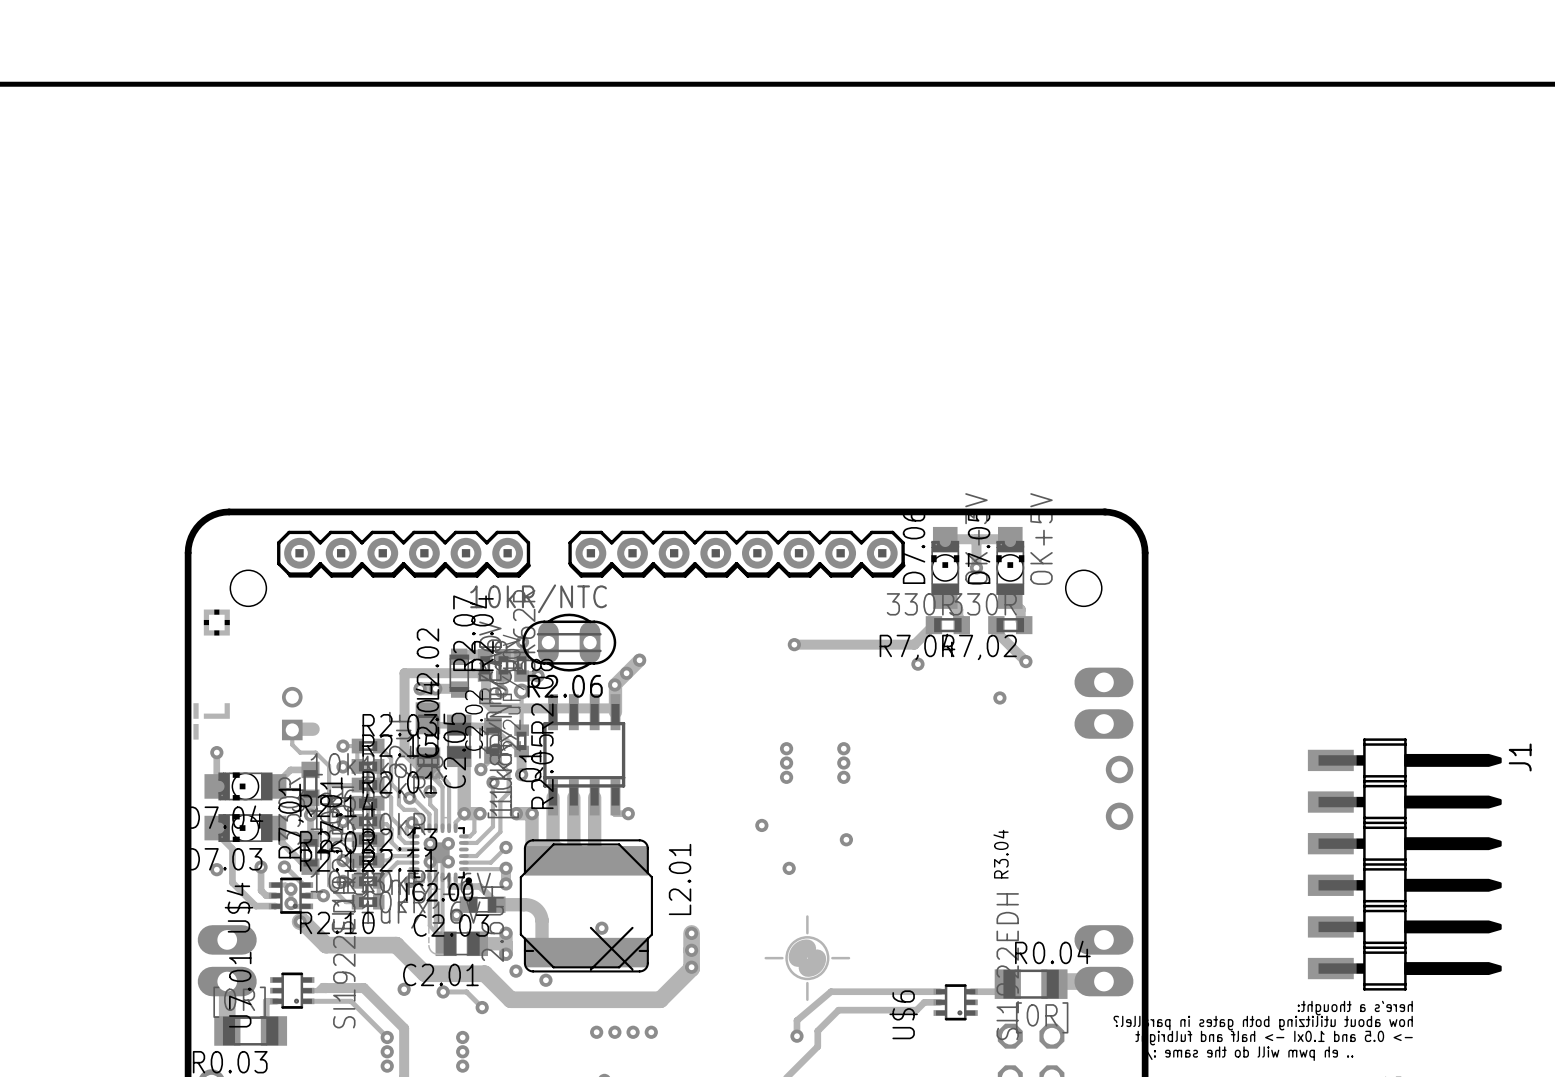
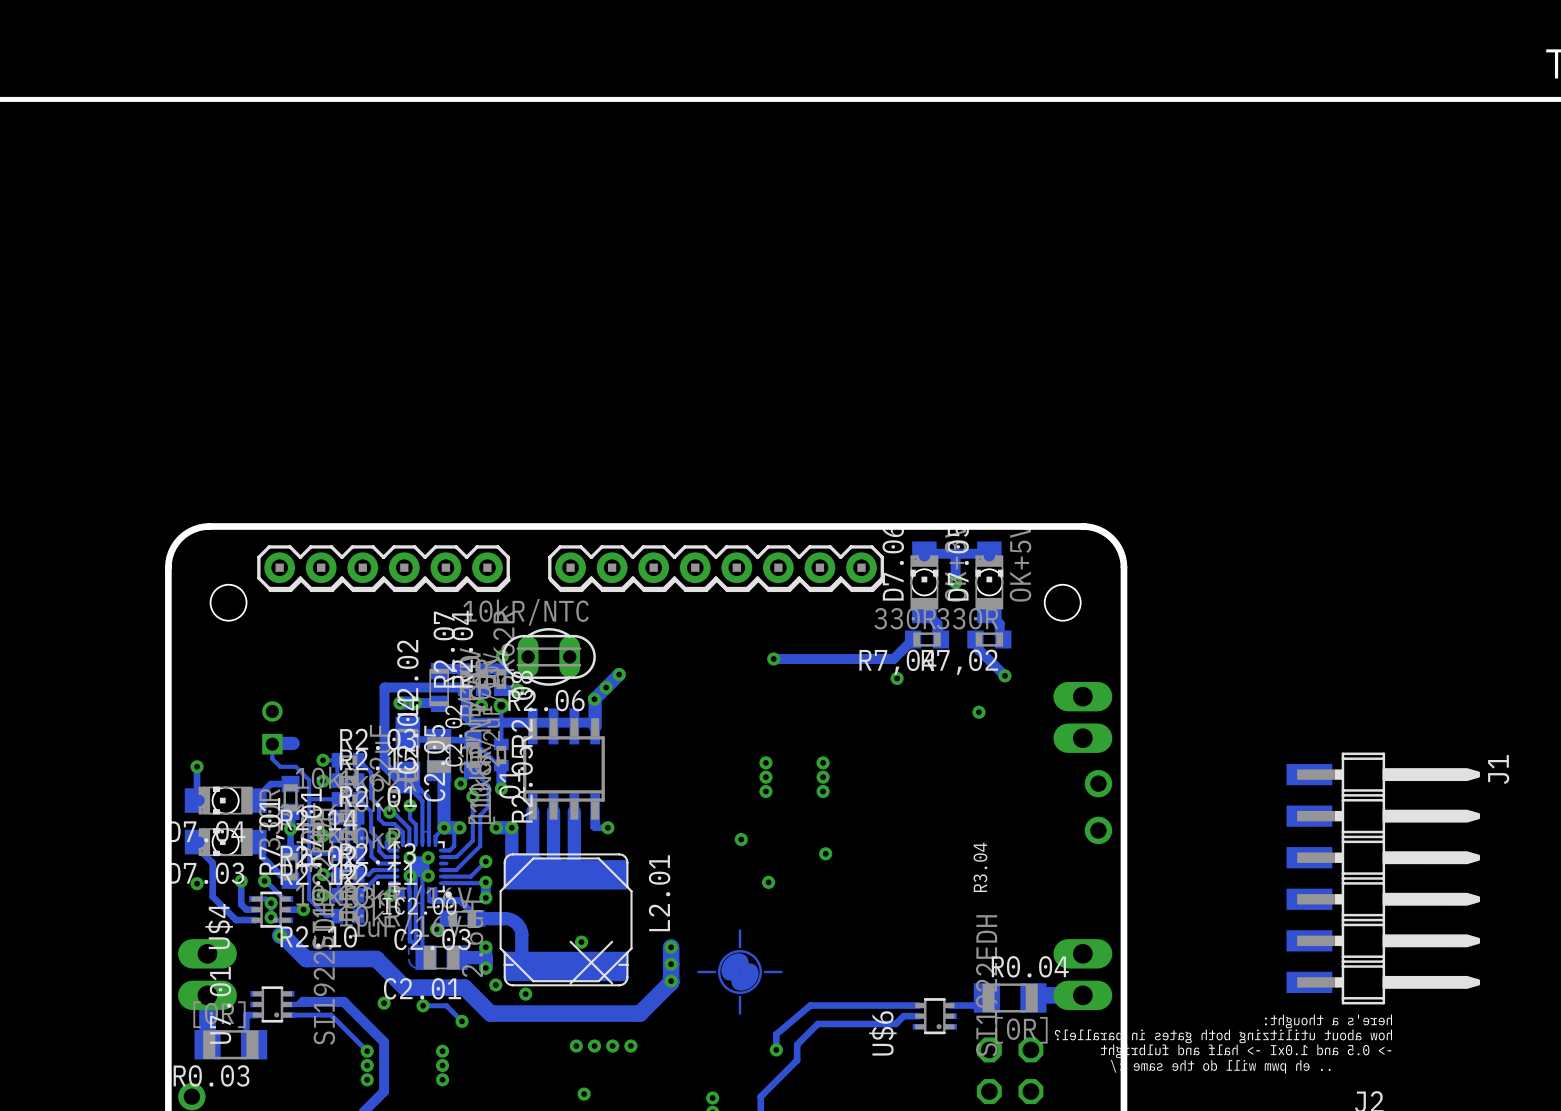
drawing: [193, 609, 230, 740] -> none
drawing position: (807, 958) -> (739, 972)

